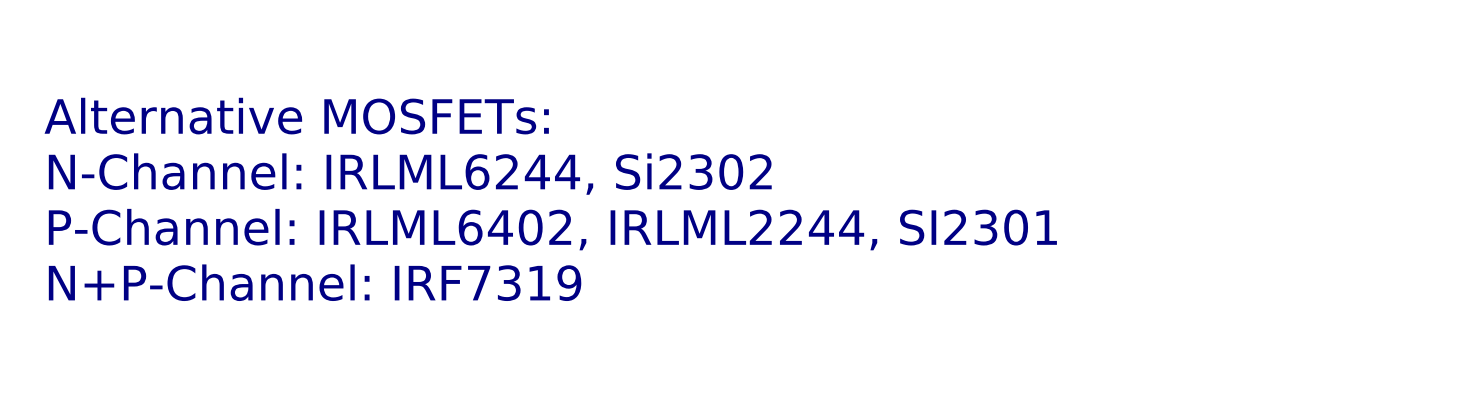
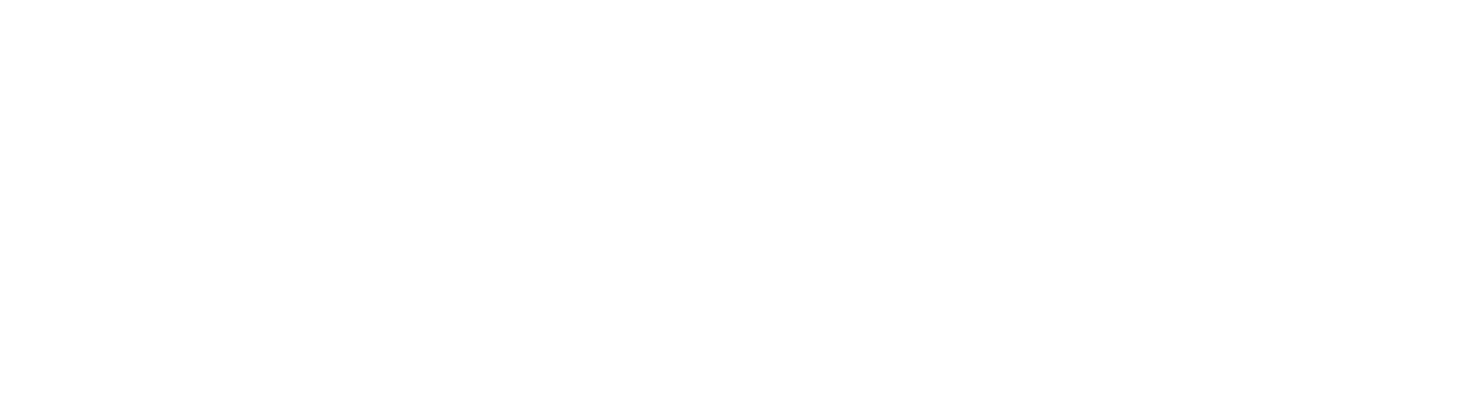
text: Alternative MOSFETs: (296, 116) -> none
text: N-Channel: IRLML6244, Si2302 (410, 174) -> none
text: P-Channel: IRLML6402, IRLML2244, SI2301 (552, 229) -> none
text: N+P-Channel: IRF7319 (315, 282) -> none

